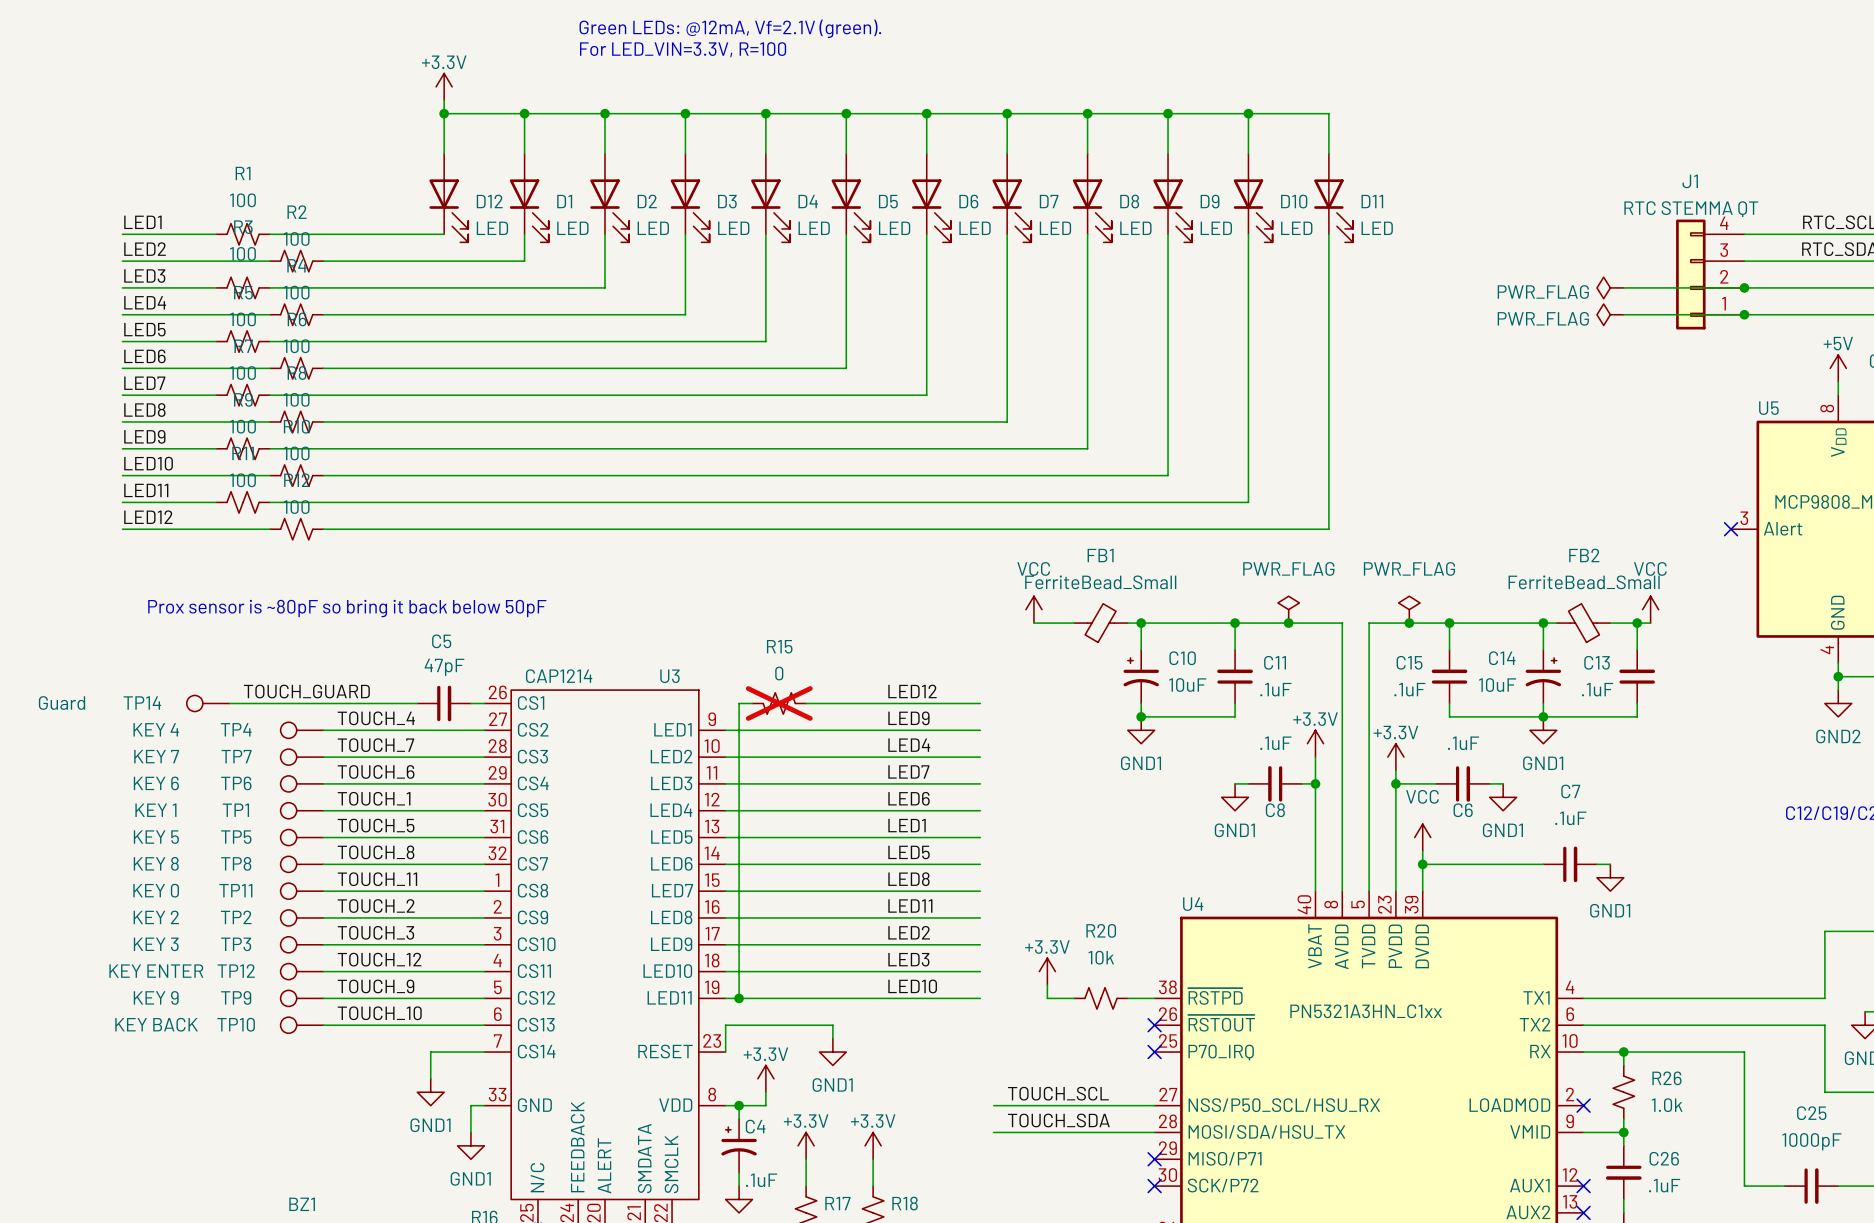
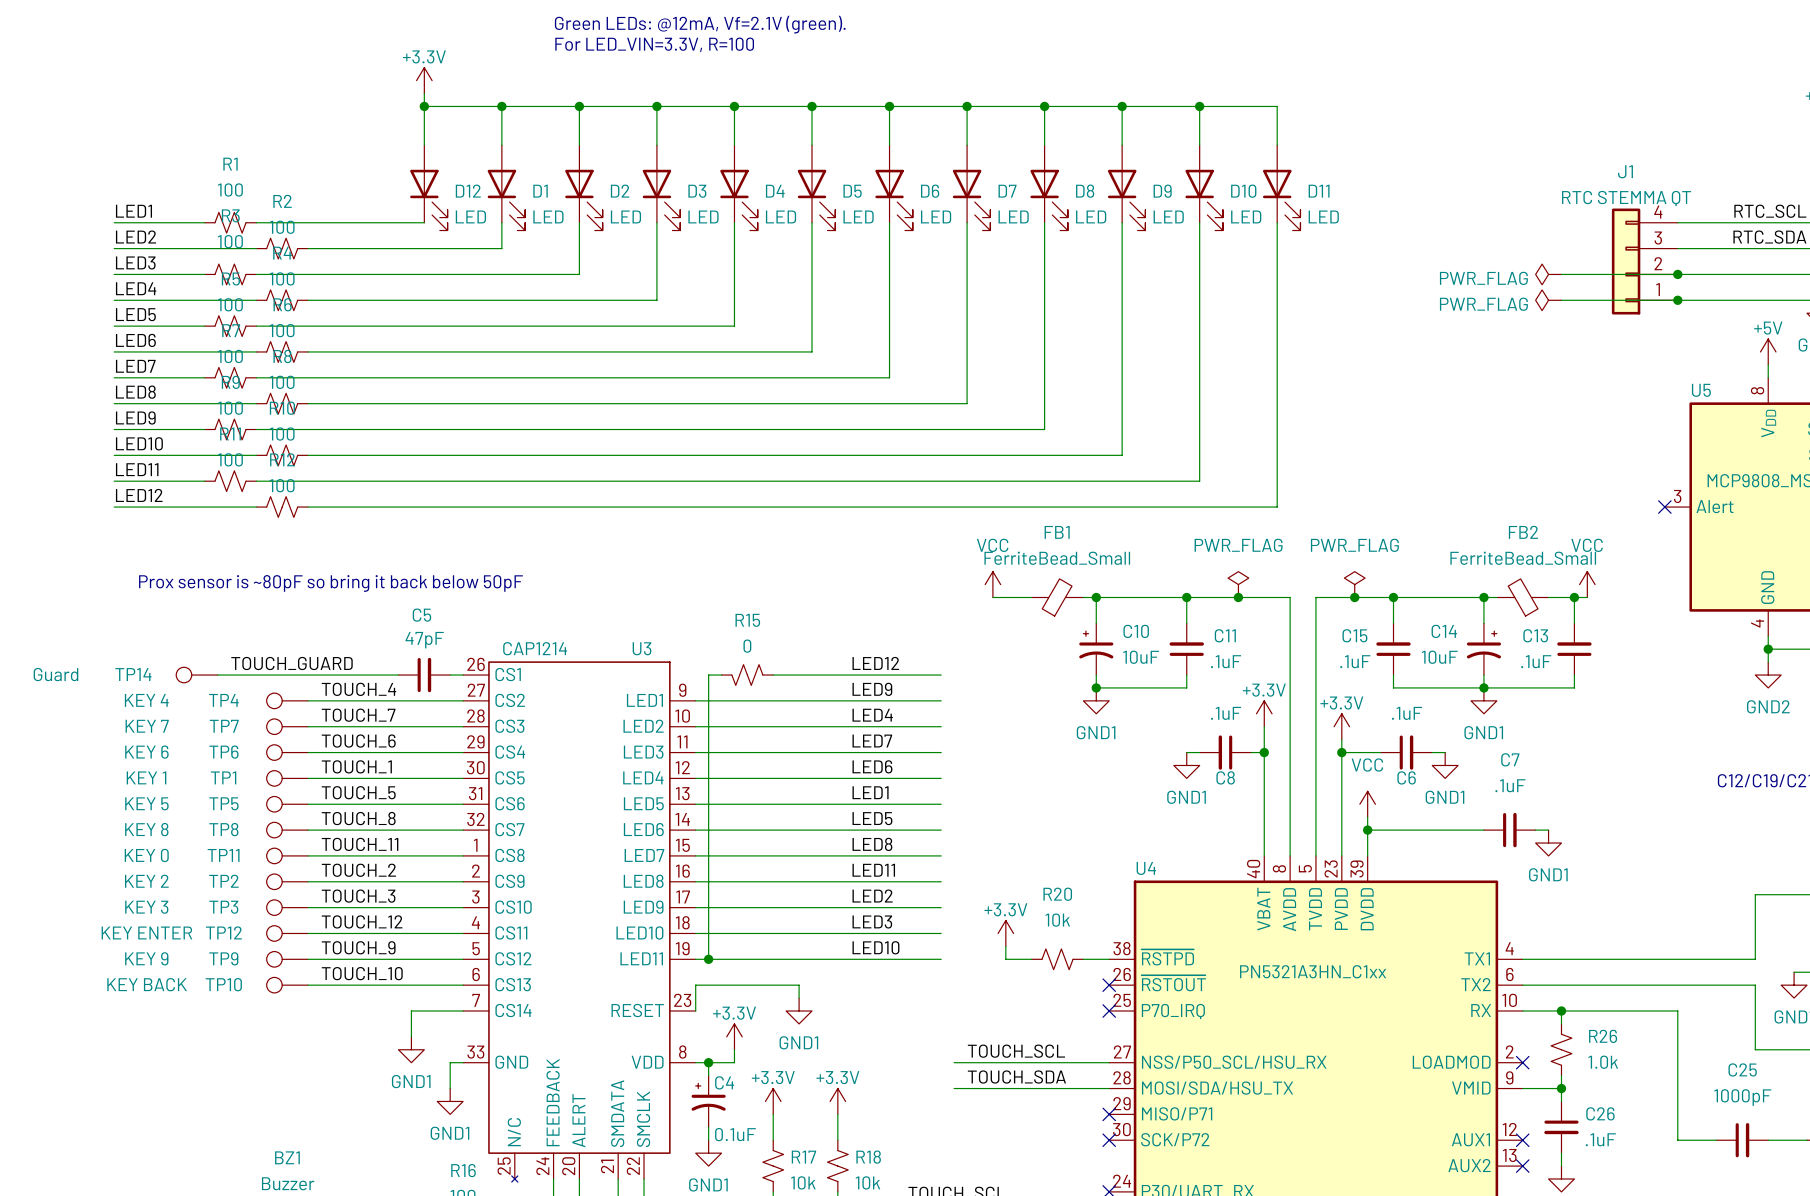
R15 do-not-place cross: (779, 703) -> none
C4 value: .1uF (761, 1180) -> 0.1uF (735, 1134)

